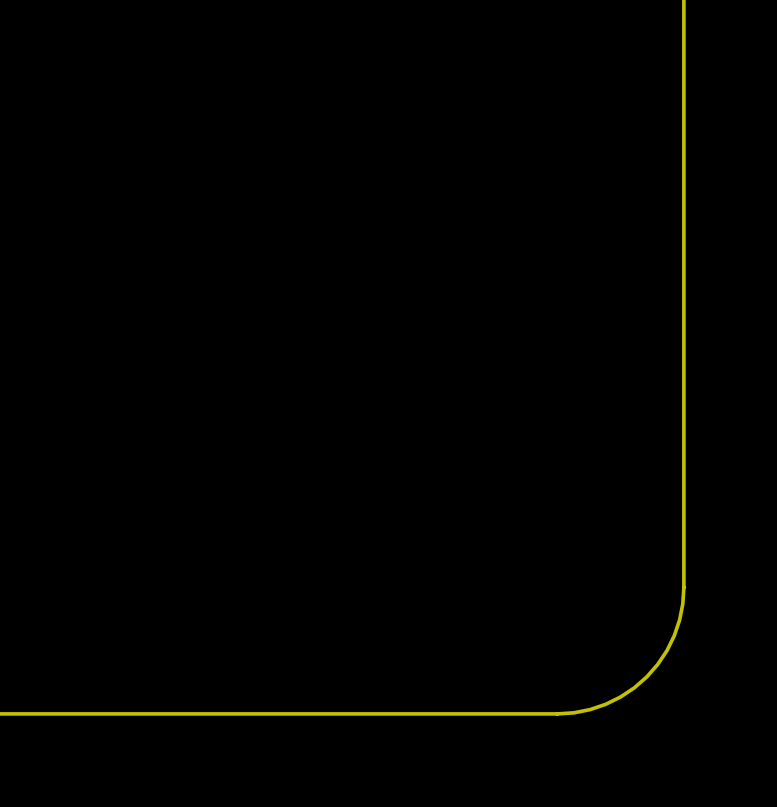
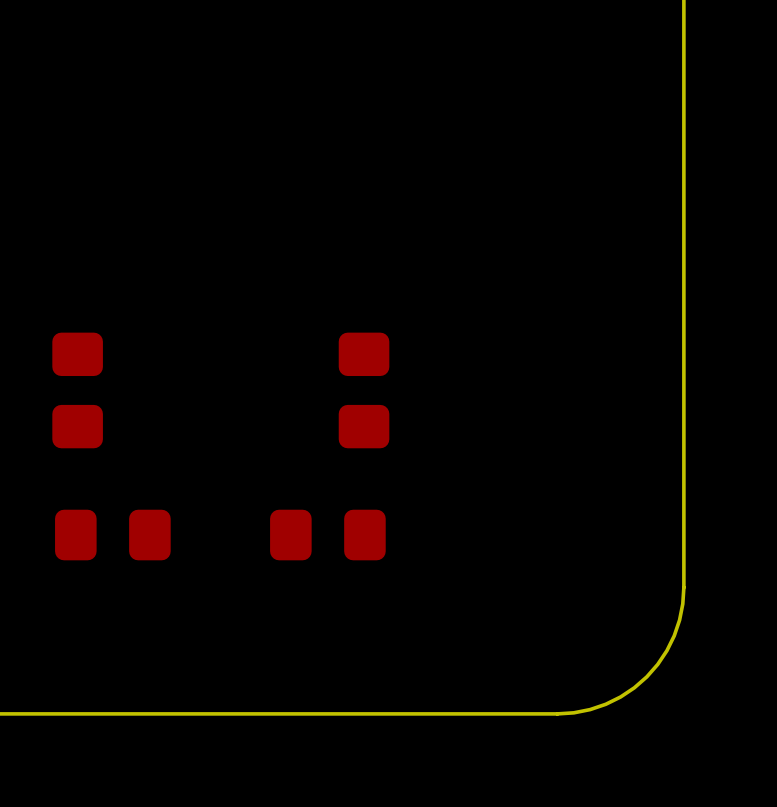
part: none -> (77, 390)
part: none -> (364, 390)
part: none -> (112, 535)
part: none -> (327, 535)

